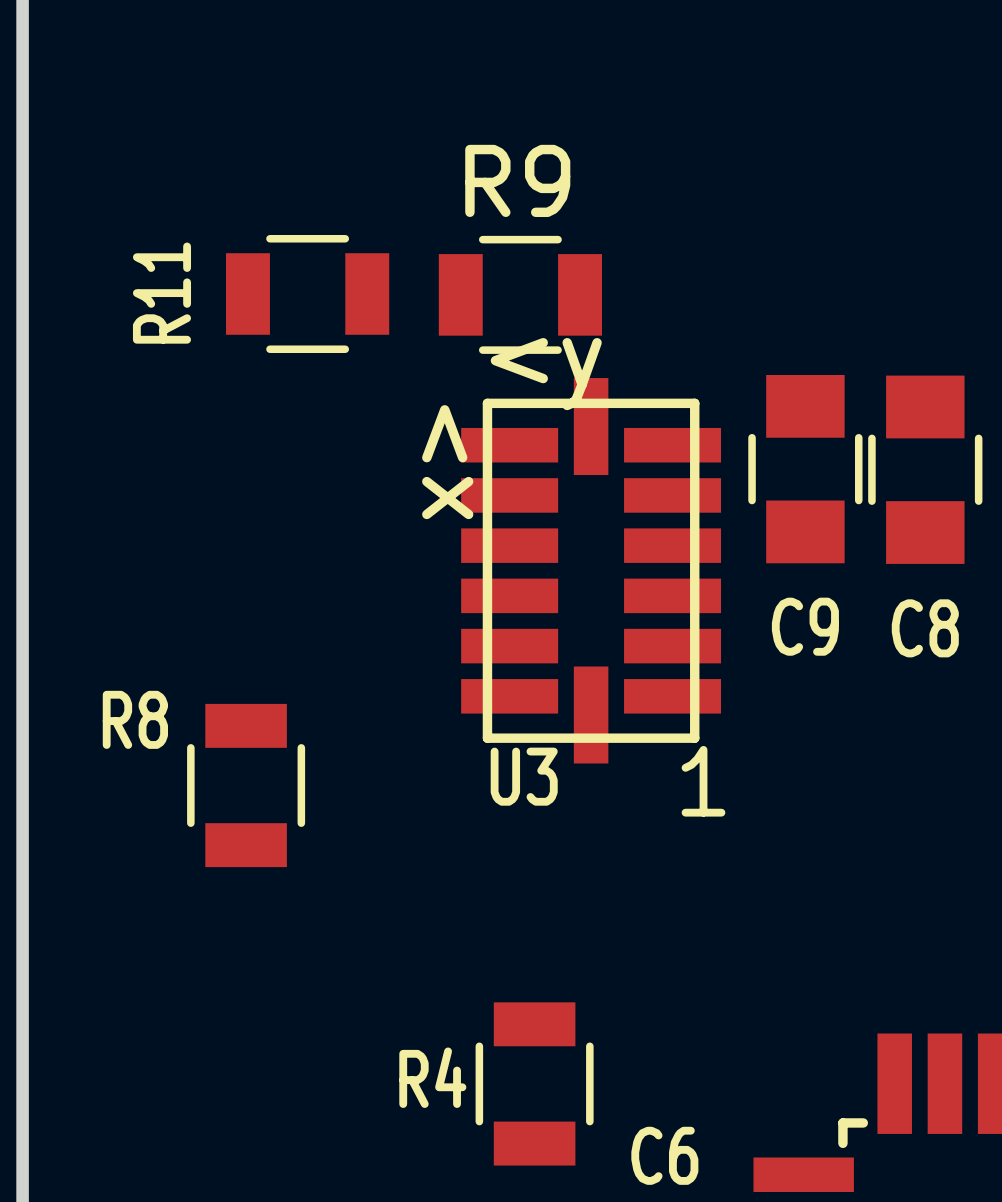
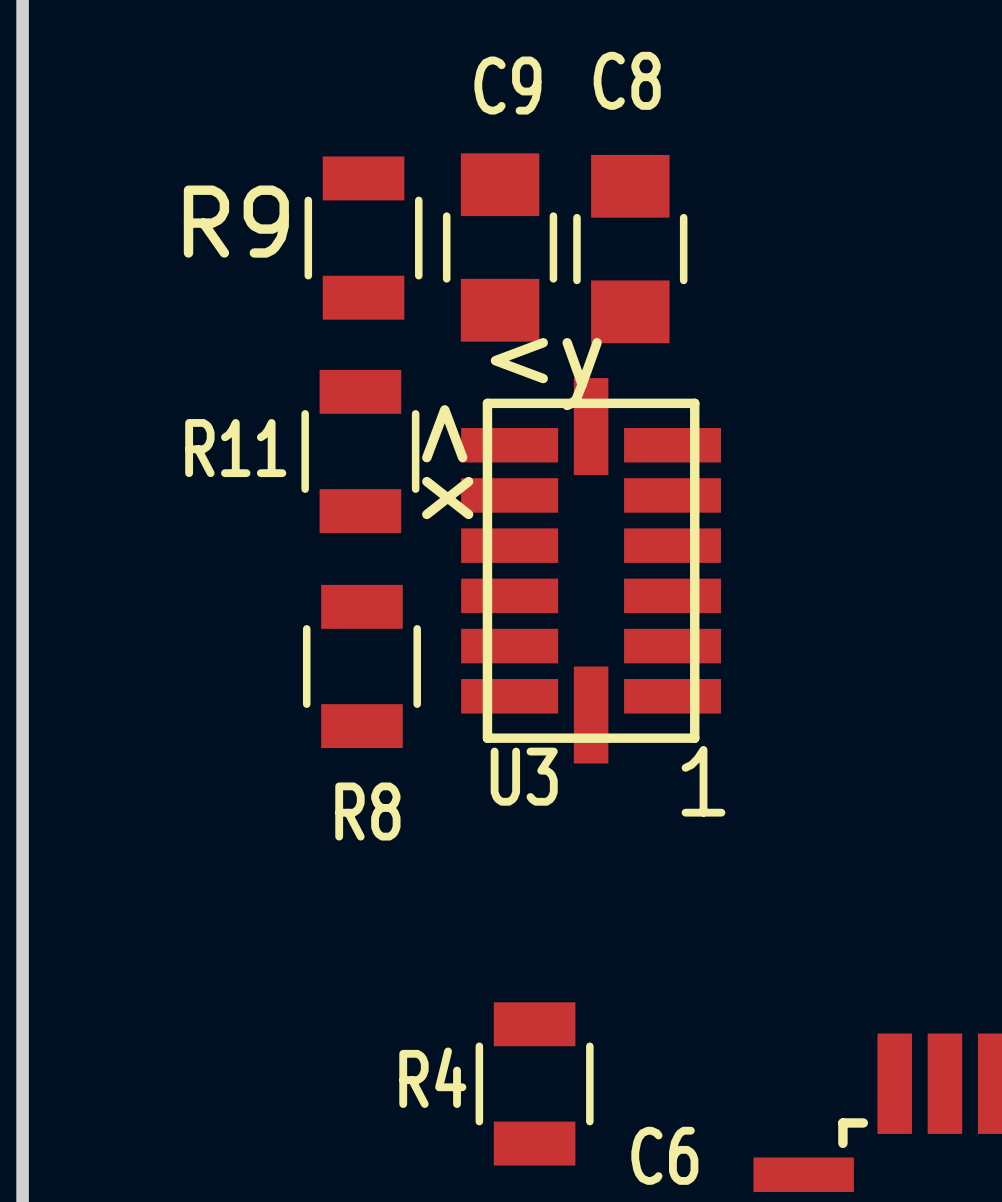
R9 name position: R9 (517, 180) -> R9 (236, 221)
R11 rotation: 0° (307, 294) -> 90° clockwise (360, 451)
R11 position: (307, 294) -> (360, 451)
R9 rotation: 0° (520, 294) -> 90° clockwise (363, 238)
R9 position: (520, 294) -> (363, 238)
C9 position: (805, 469) -> (500, 247)
C8 position: (925, 469) -> (630, 249)
C9 name position: C9 (805, 626) -> C9 (507, 85)
C8 name position: C8 (925, 628) -> C8 (627, 80)
R8 name position: R8 (135, 719) -> R8 (367, 811)
R8 position: (246, 785) -> (361, 666)

